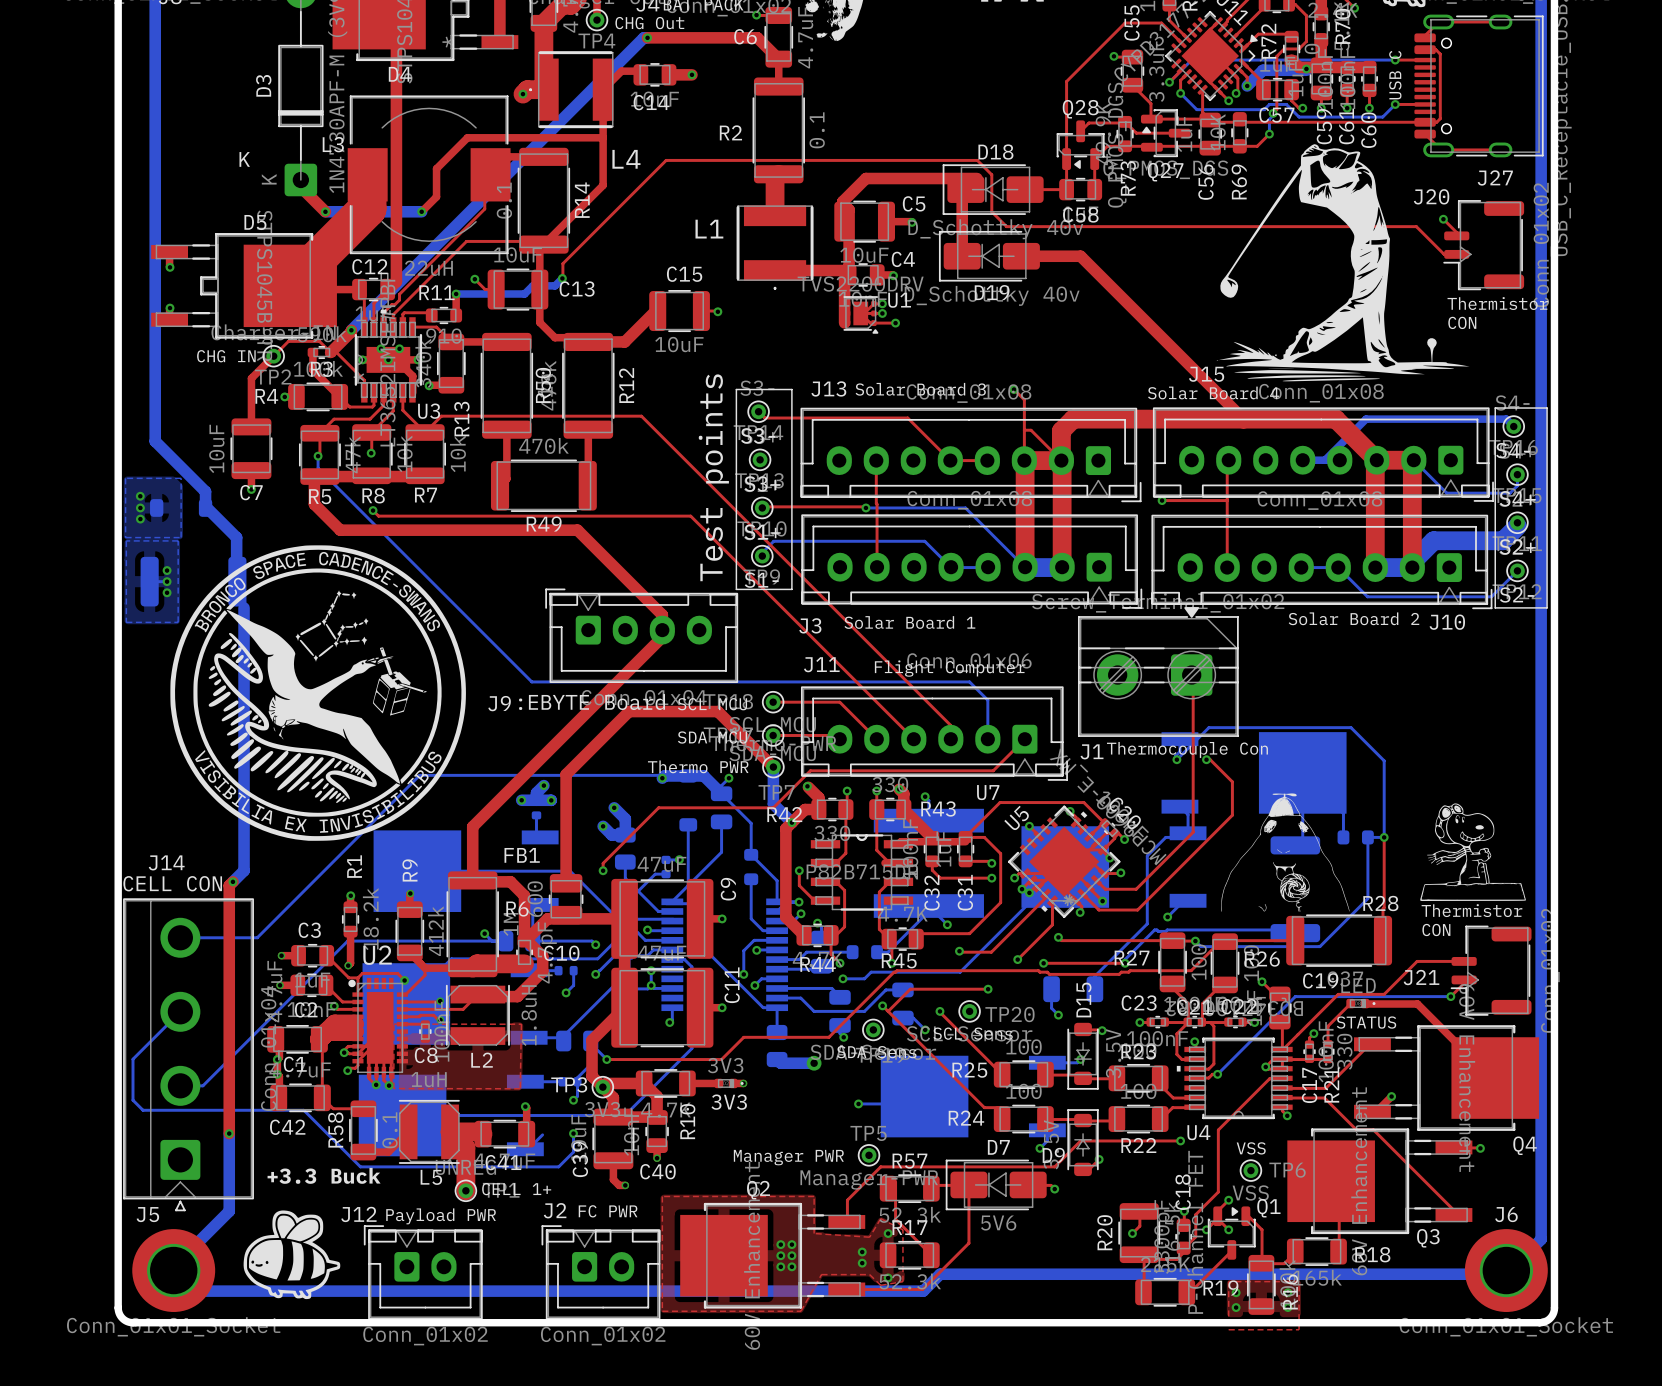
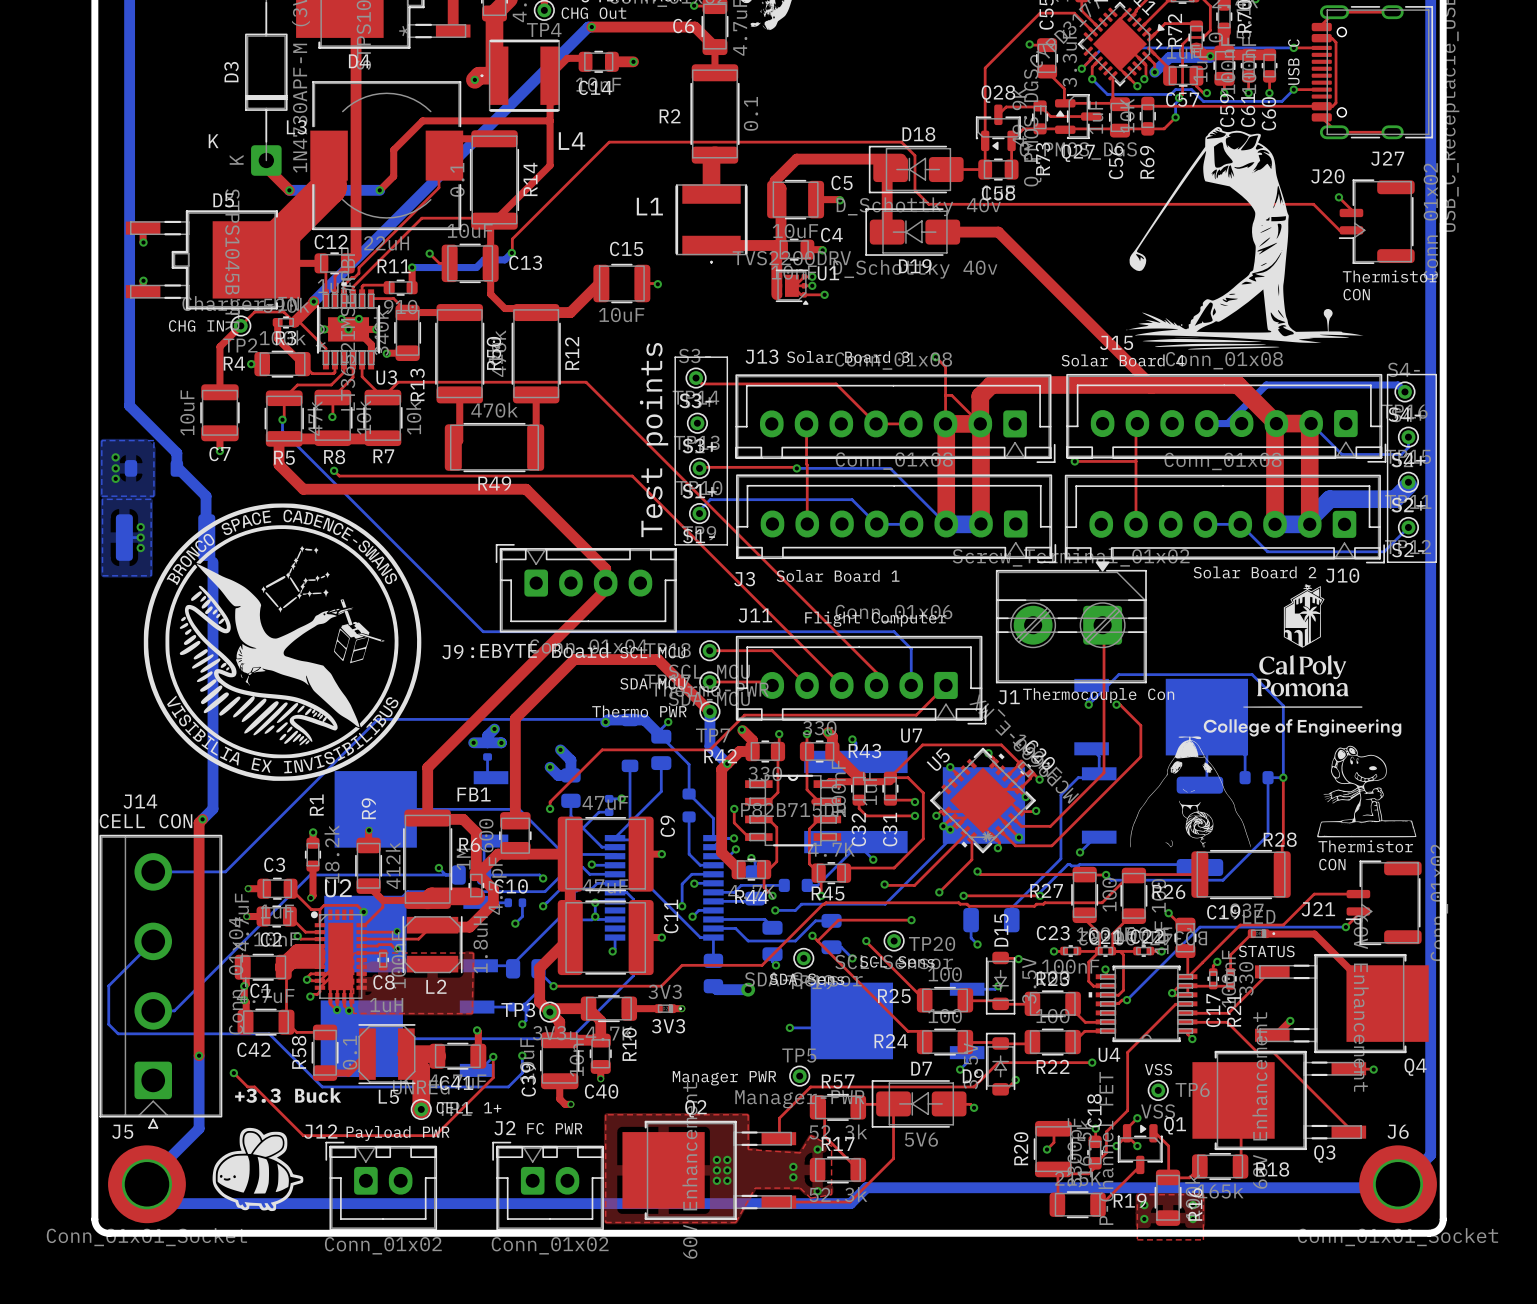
drawing: none -> [1203, 584, 1402, 737]
top track: none -> (493, 1056) (493, 1077) (435, 1135) (303, 1135) (254, 1086) (247, 1086) (233, 1073)
via: none -> (493, 1056)
via: none -> (233, 1073)

